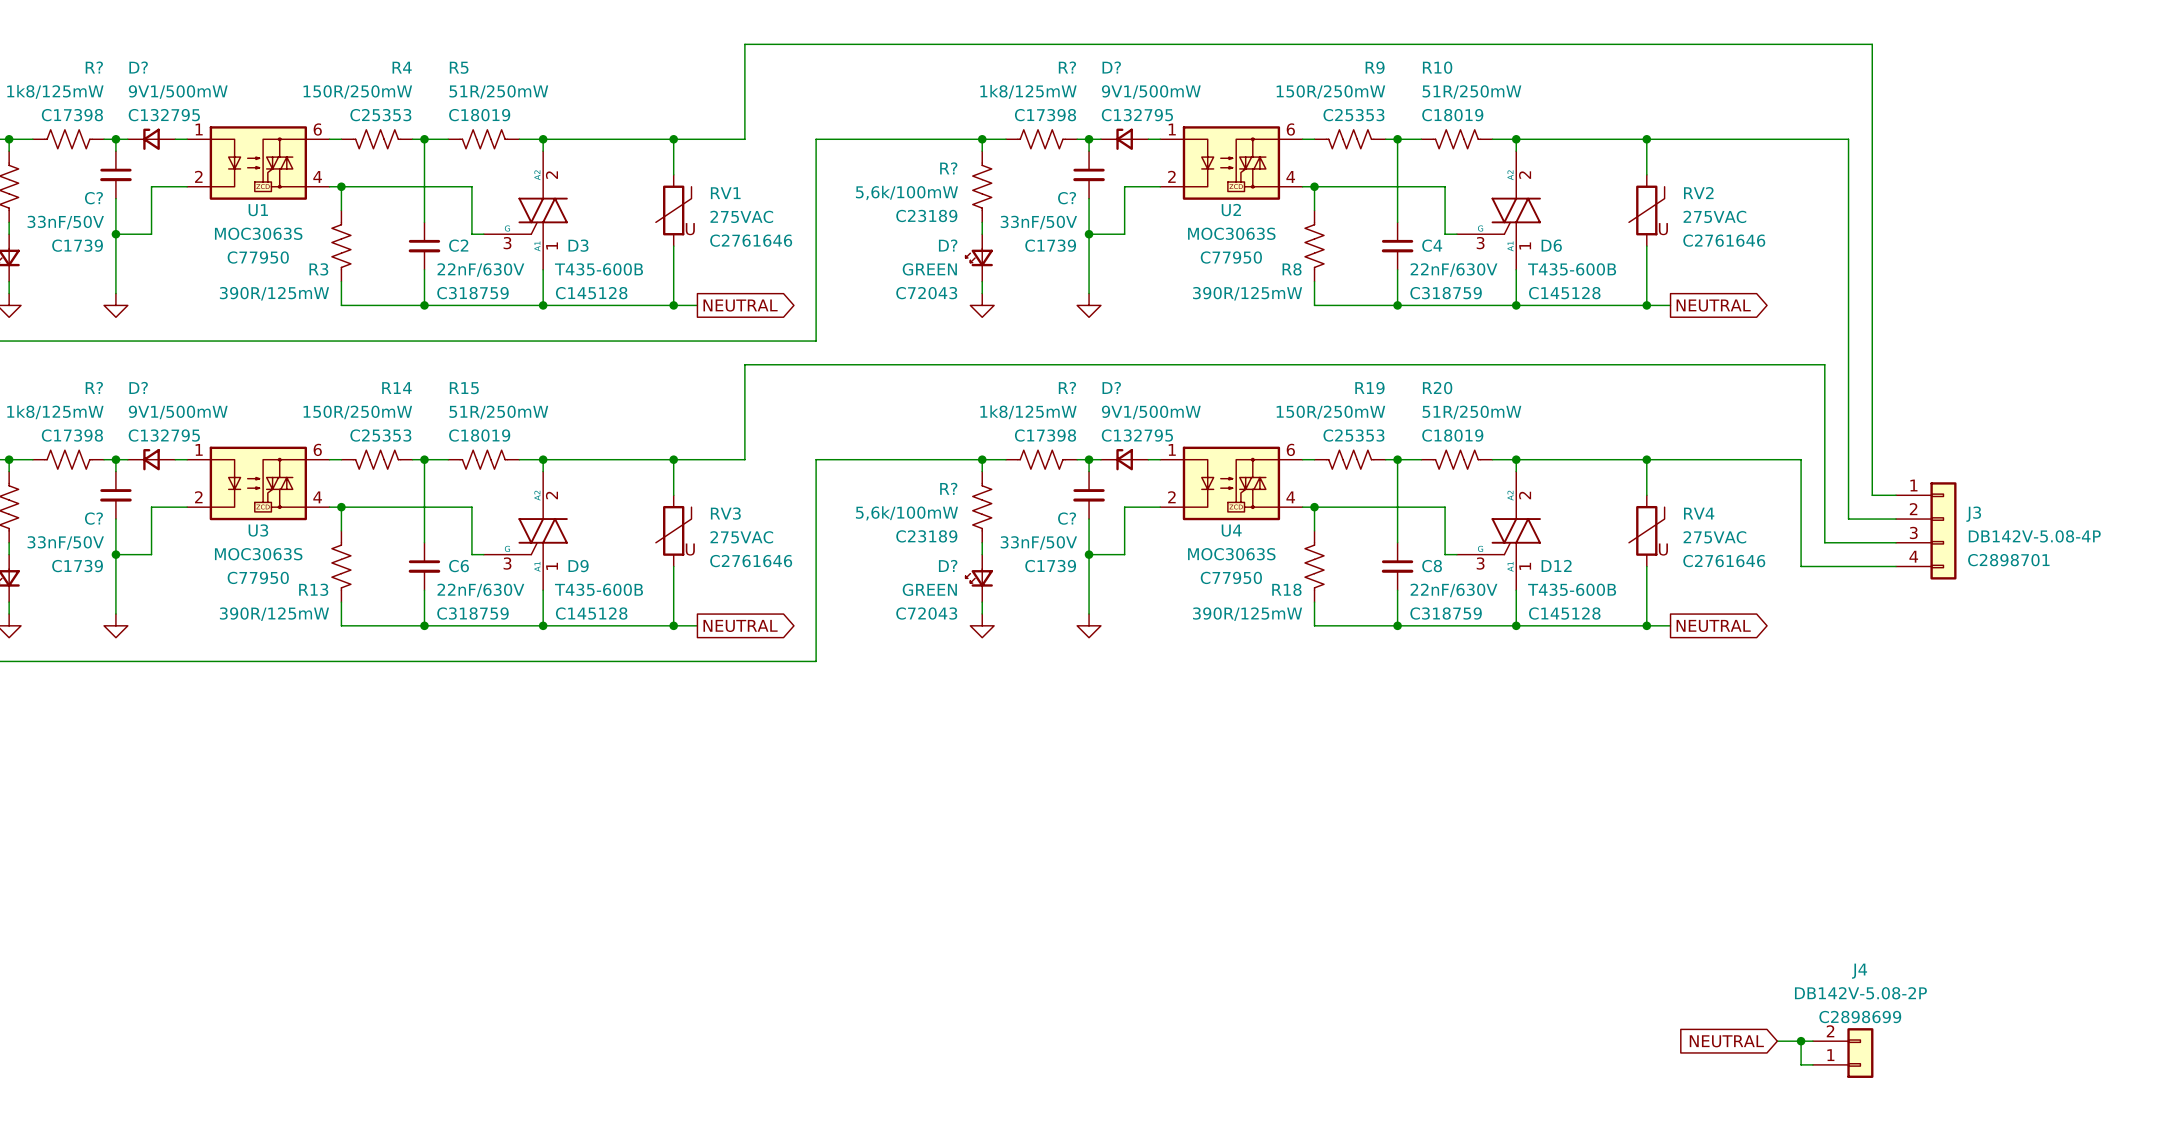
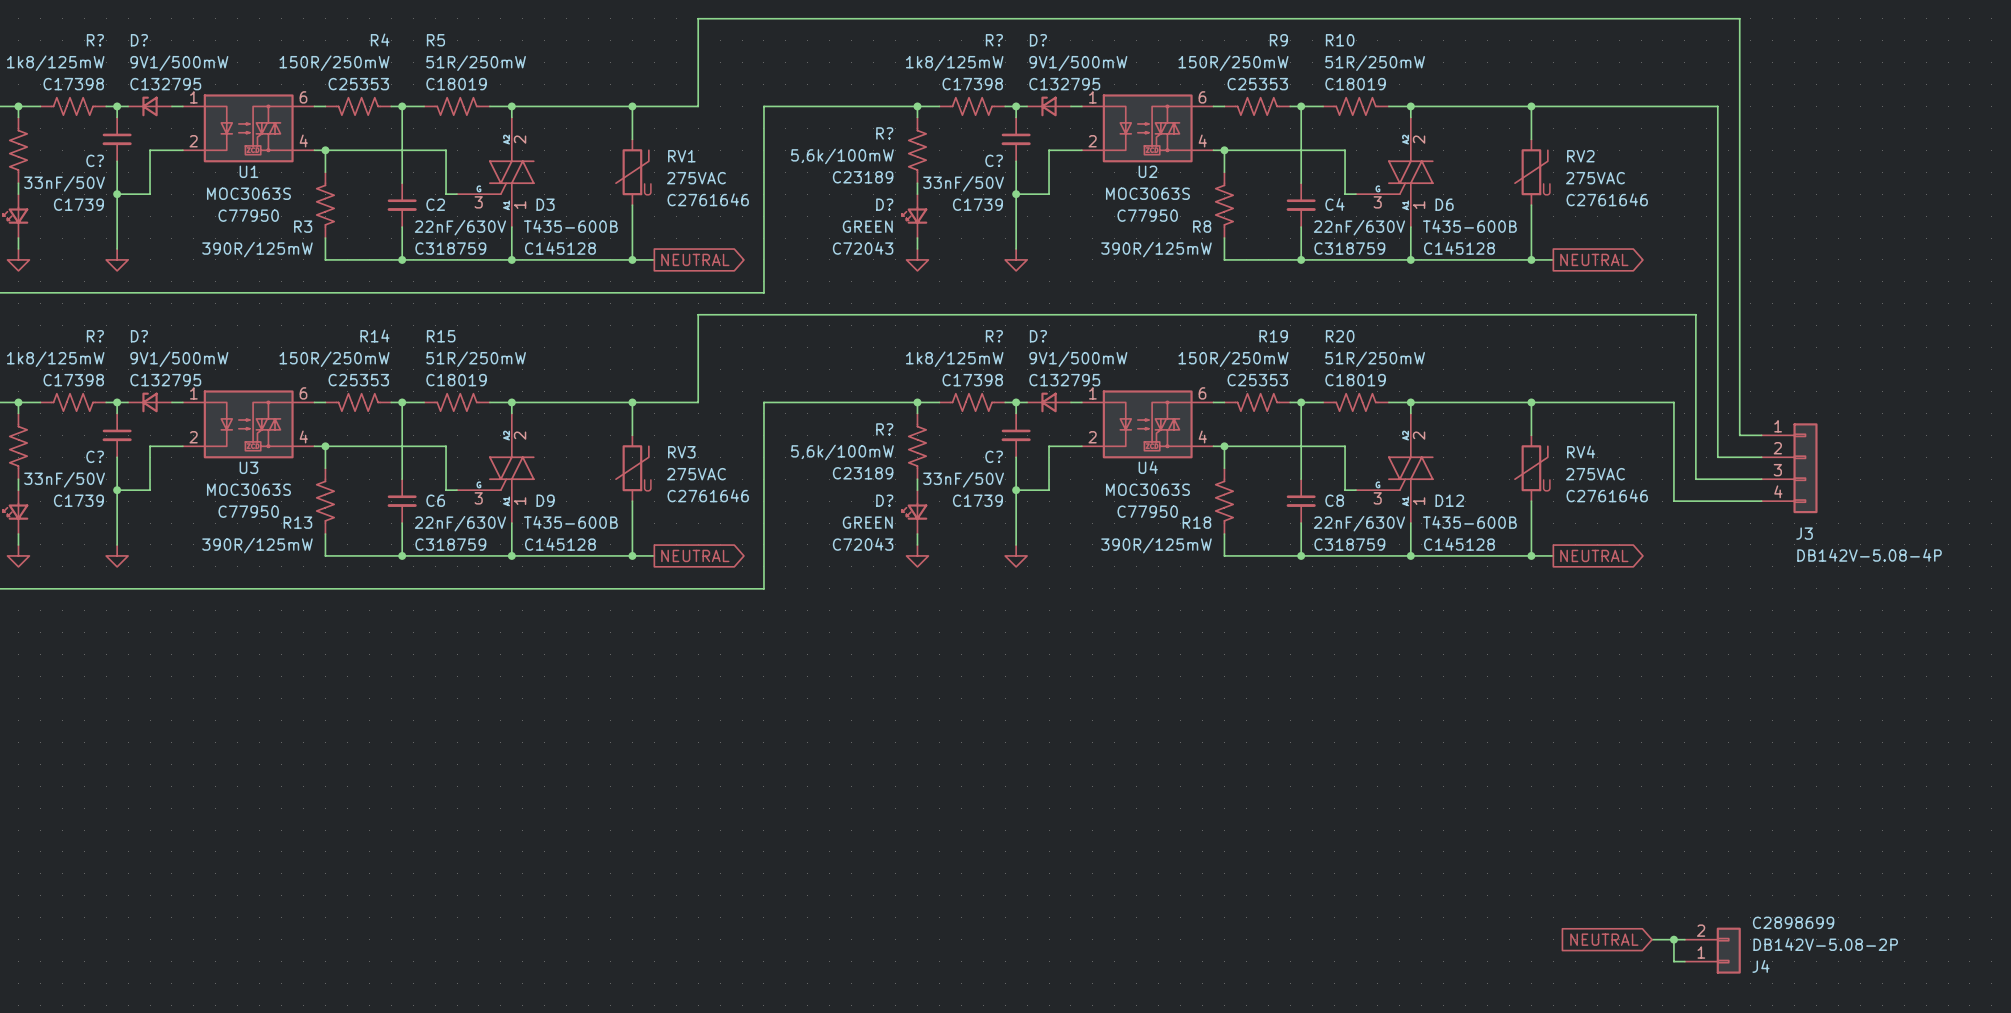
J3 name position: J3 (1973, 514) -> J3 (1804, 533)
J3 value position: DB142V-5.08-4P (2034, 536) -> DB142V-5.08-4P (1869, 555)
J3 text: C2898701 (2008, 560) -> none
J4 name position: J4 (1859, 971) -> J4 (1760, 966)
J4 value position: DB142V-5.08-2P (1860, 993) -> DB142V-5.08-2P (1825, 944)
J4 text position: C2898699 (1860, 1017) -> C2898699 (1793, 922)

